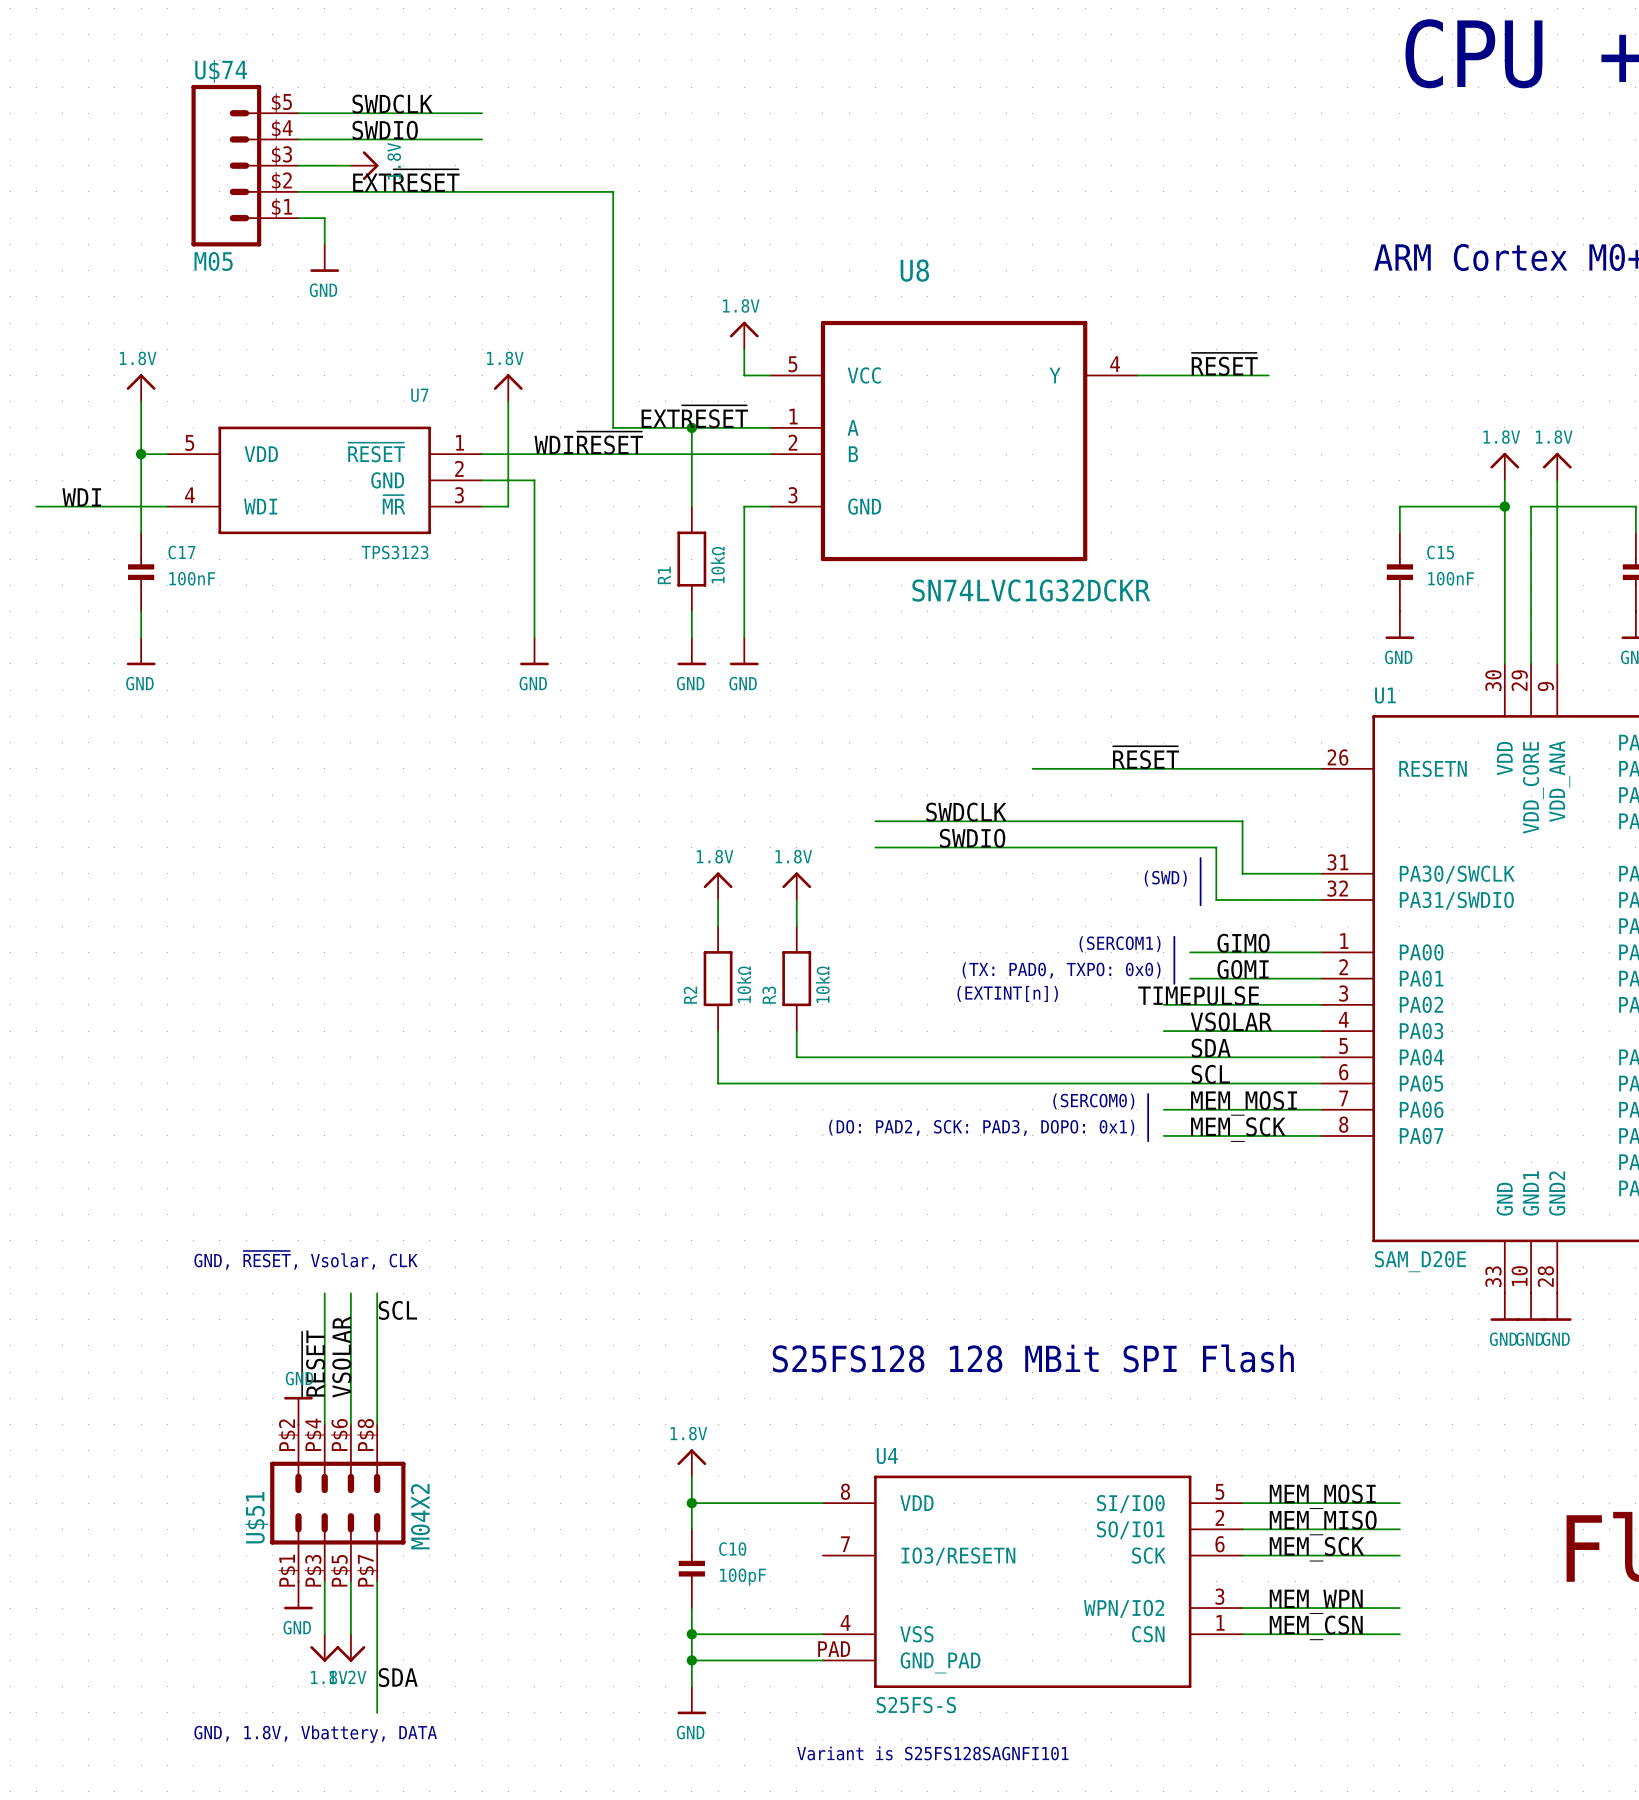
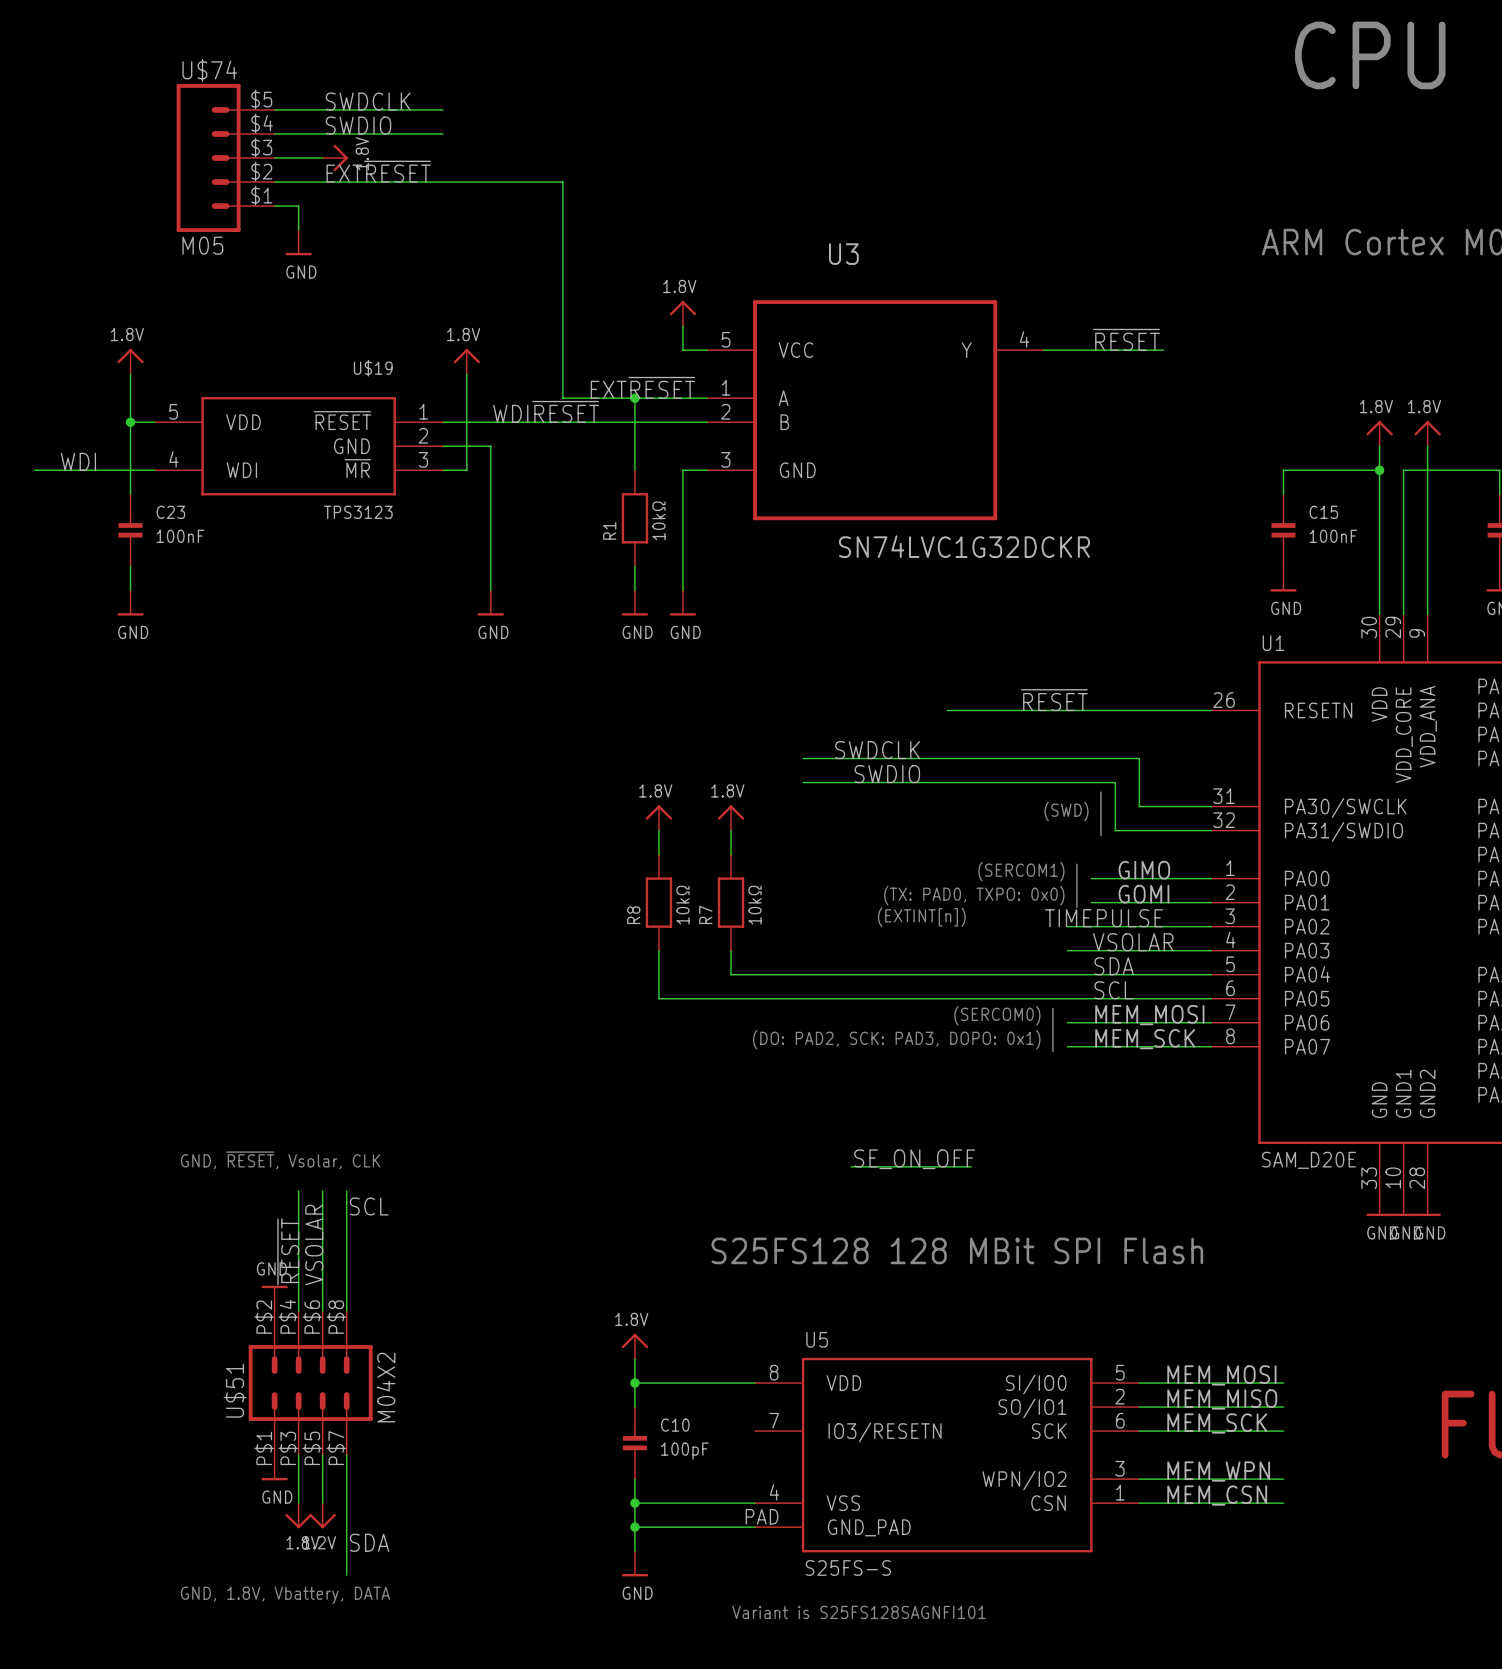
U8 name: U8 (914, 270) -> U3 (843, 254)
U7 name: U7 (419, 395) -> U$19 (373, 368)
C17 name: C17 (181, 552) -> C23 (170, 512)
R2 name: R2 (690, 995) -> R8 (633, 915)
R3 name: R3 (769, 995) -> R7 (705, 914)
label: none -> SE_ON_OFF (914, 1159)
wire: none -> (851, 1166) (971, 1166)
U4 name: U4 (887, 1456) -> U5 (817, 1339)

